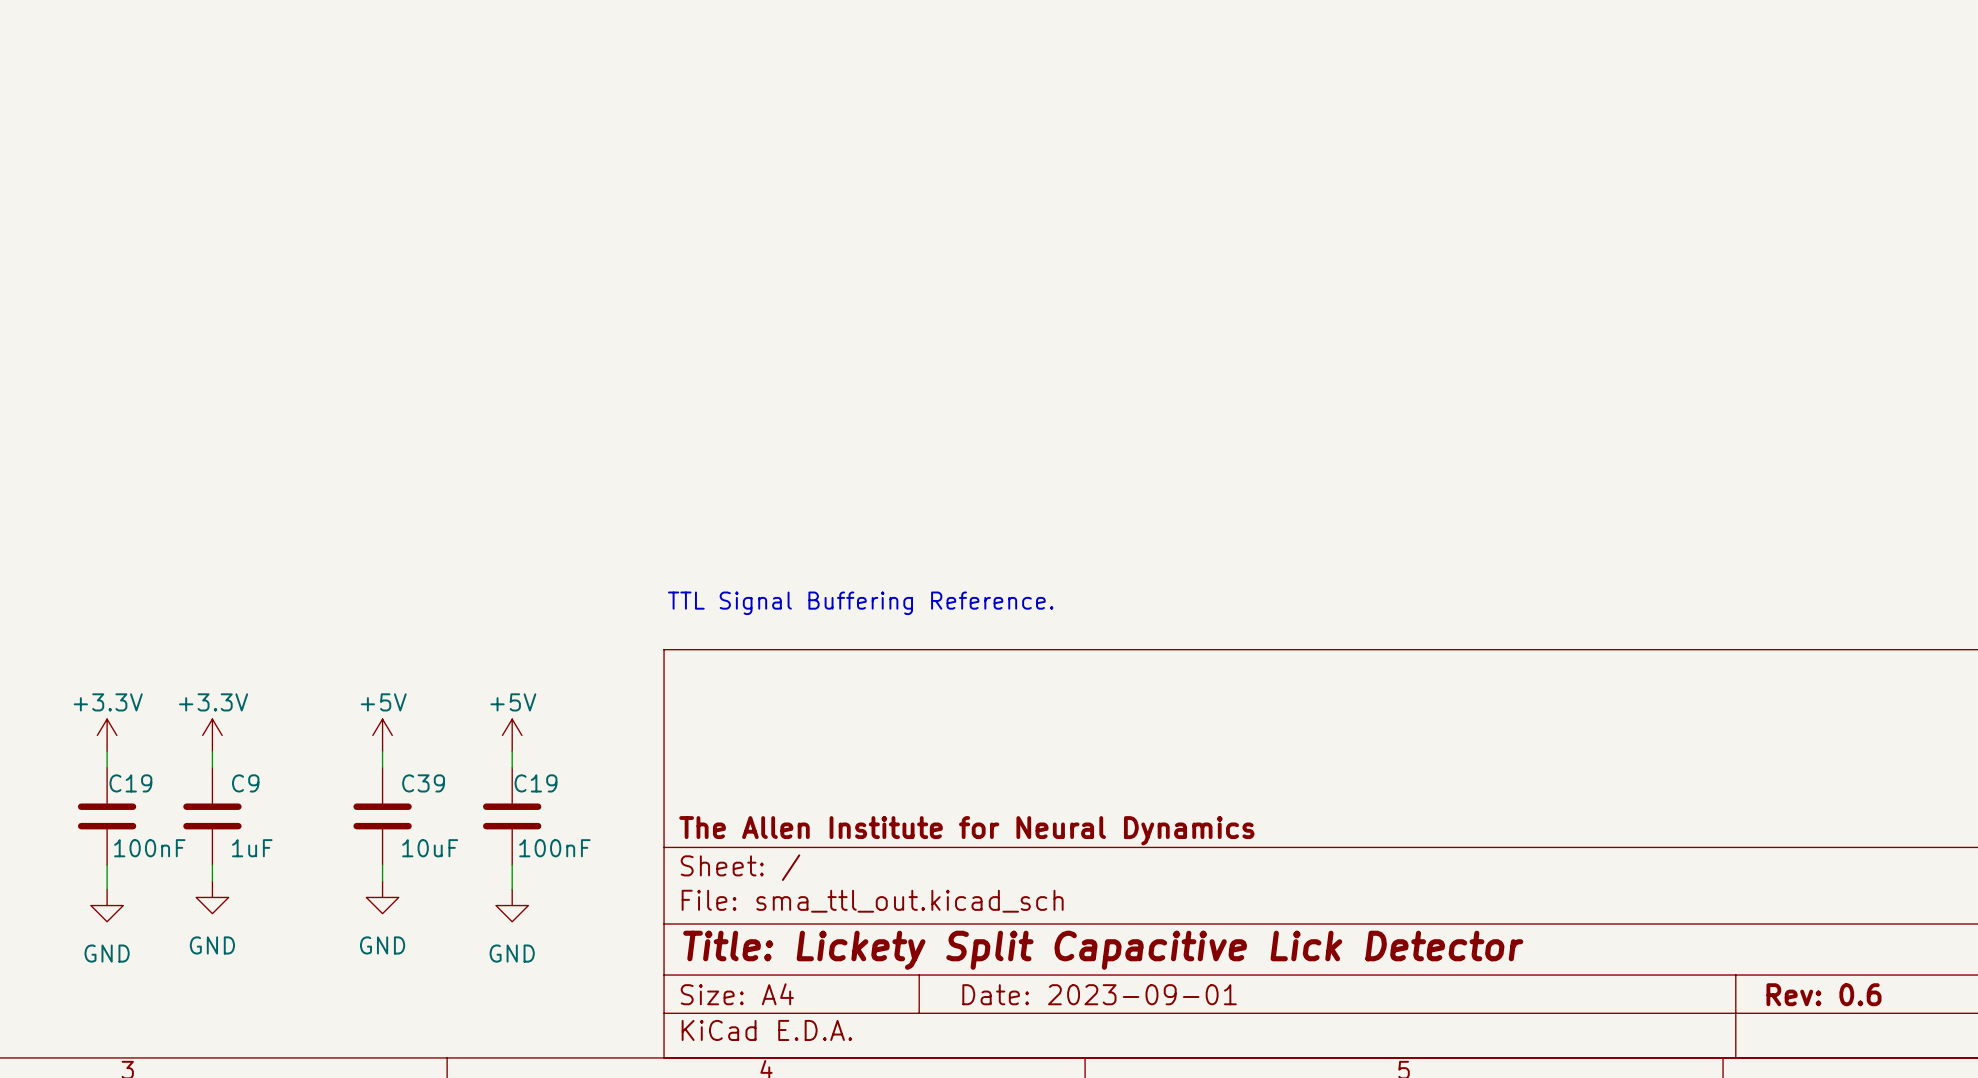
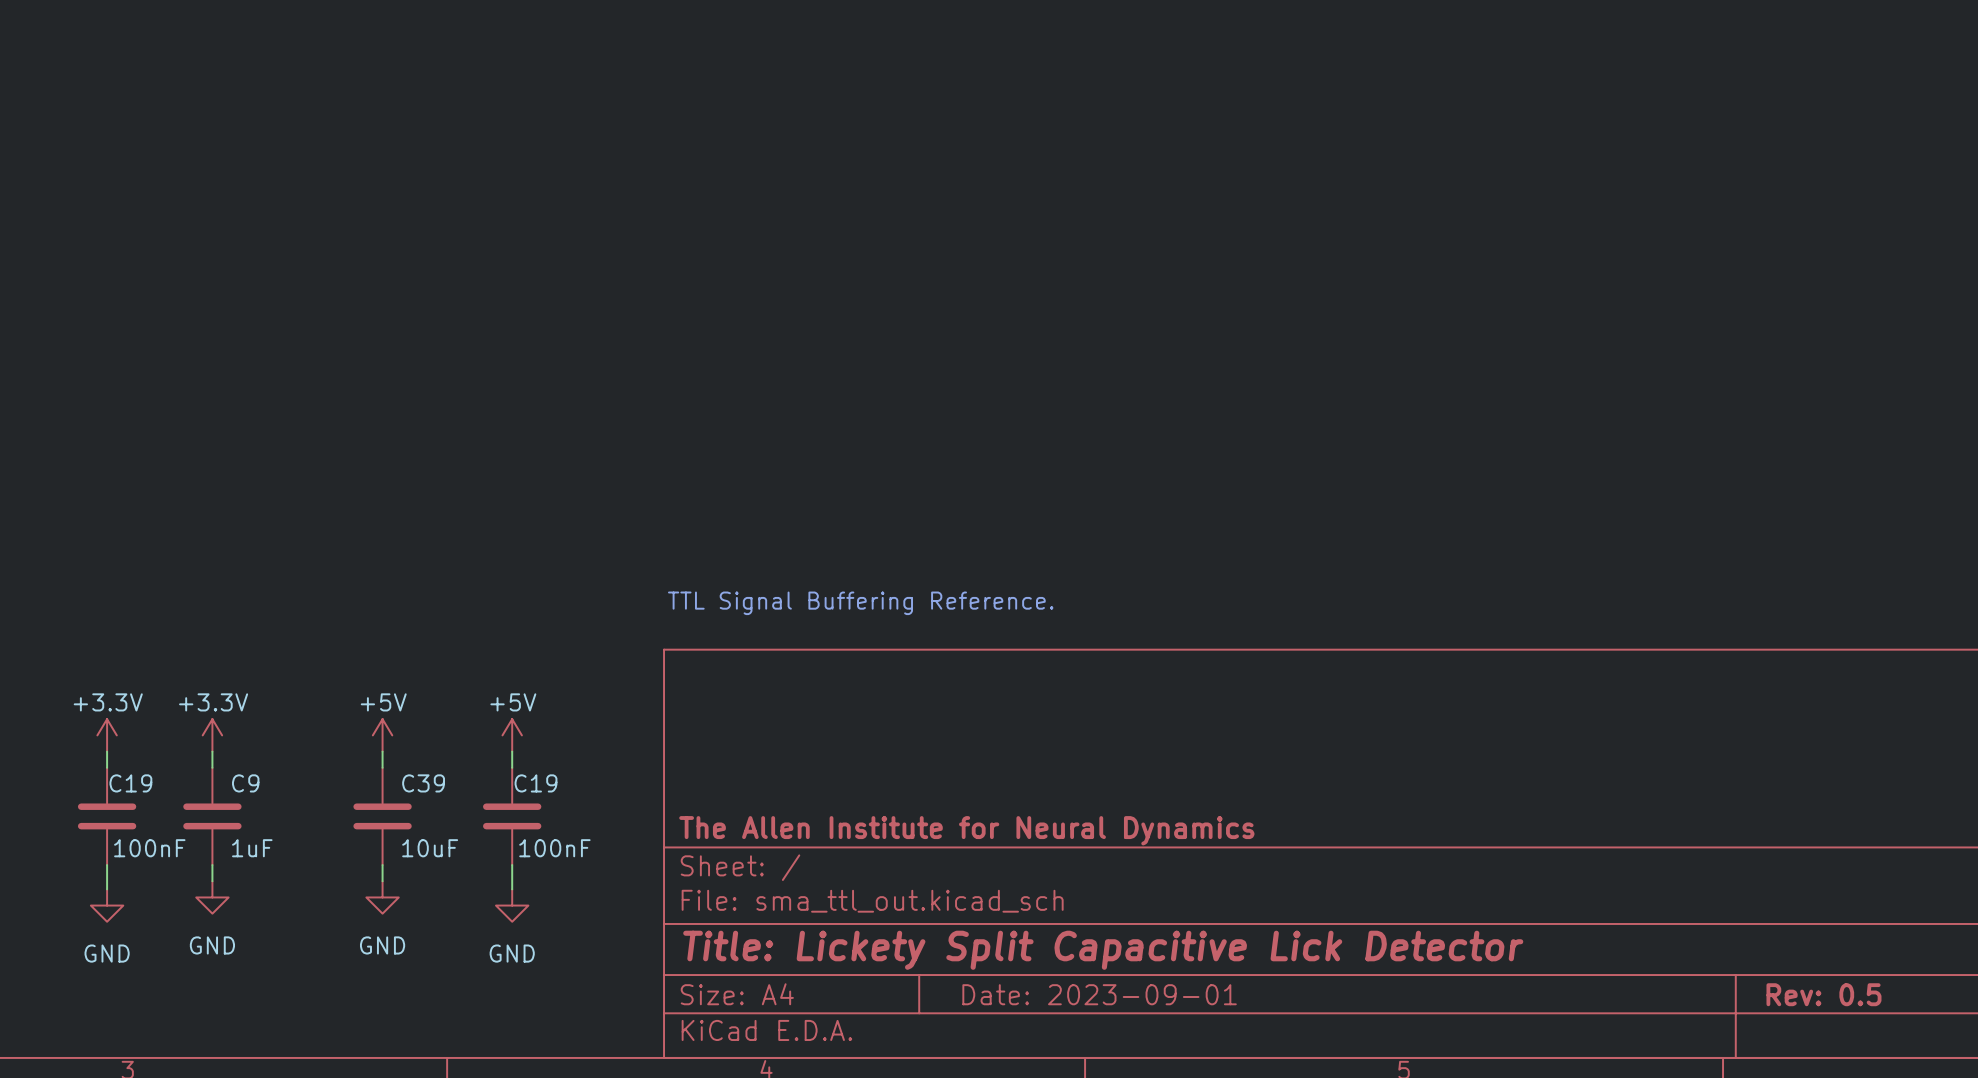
title block: Rev: 0.6 (1823, 994) -> Rev: 0.5 (1823, 994)

